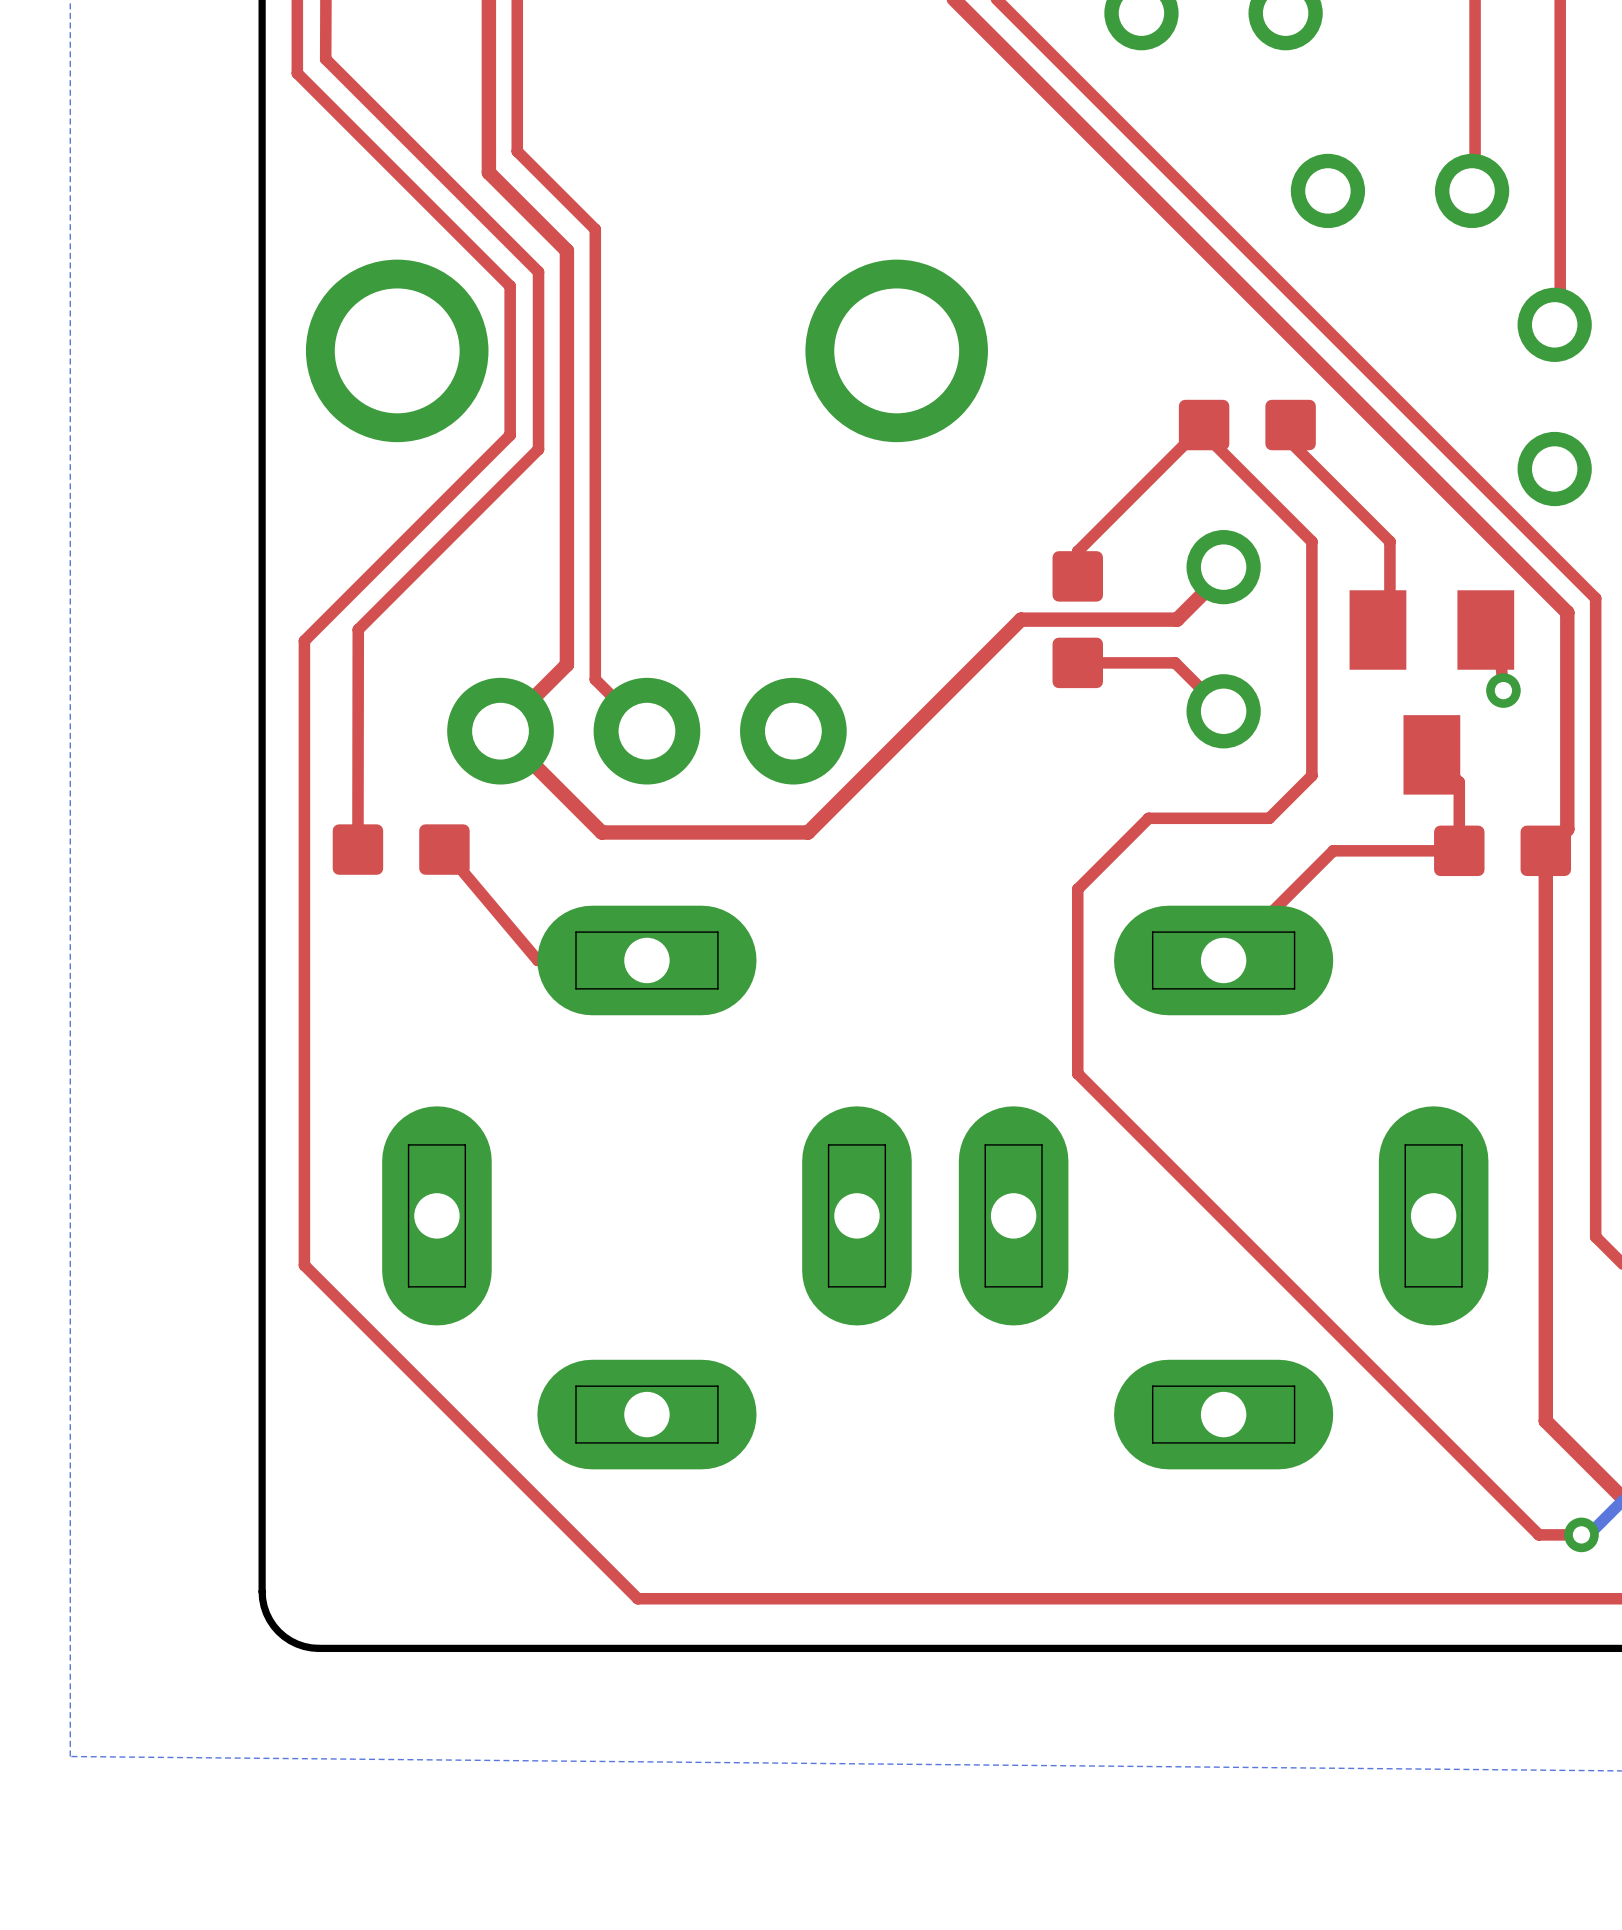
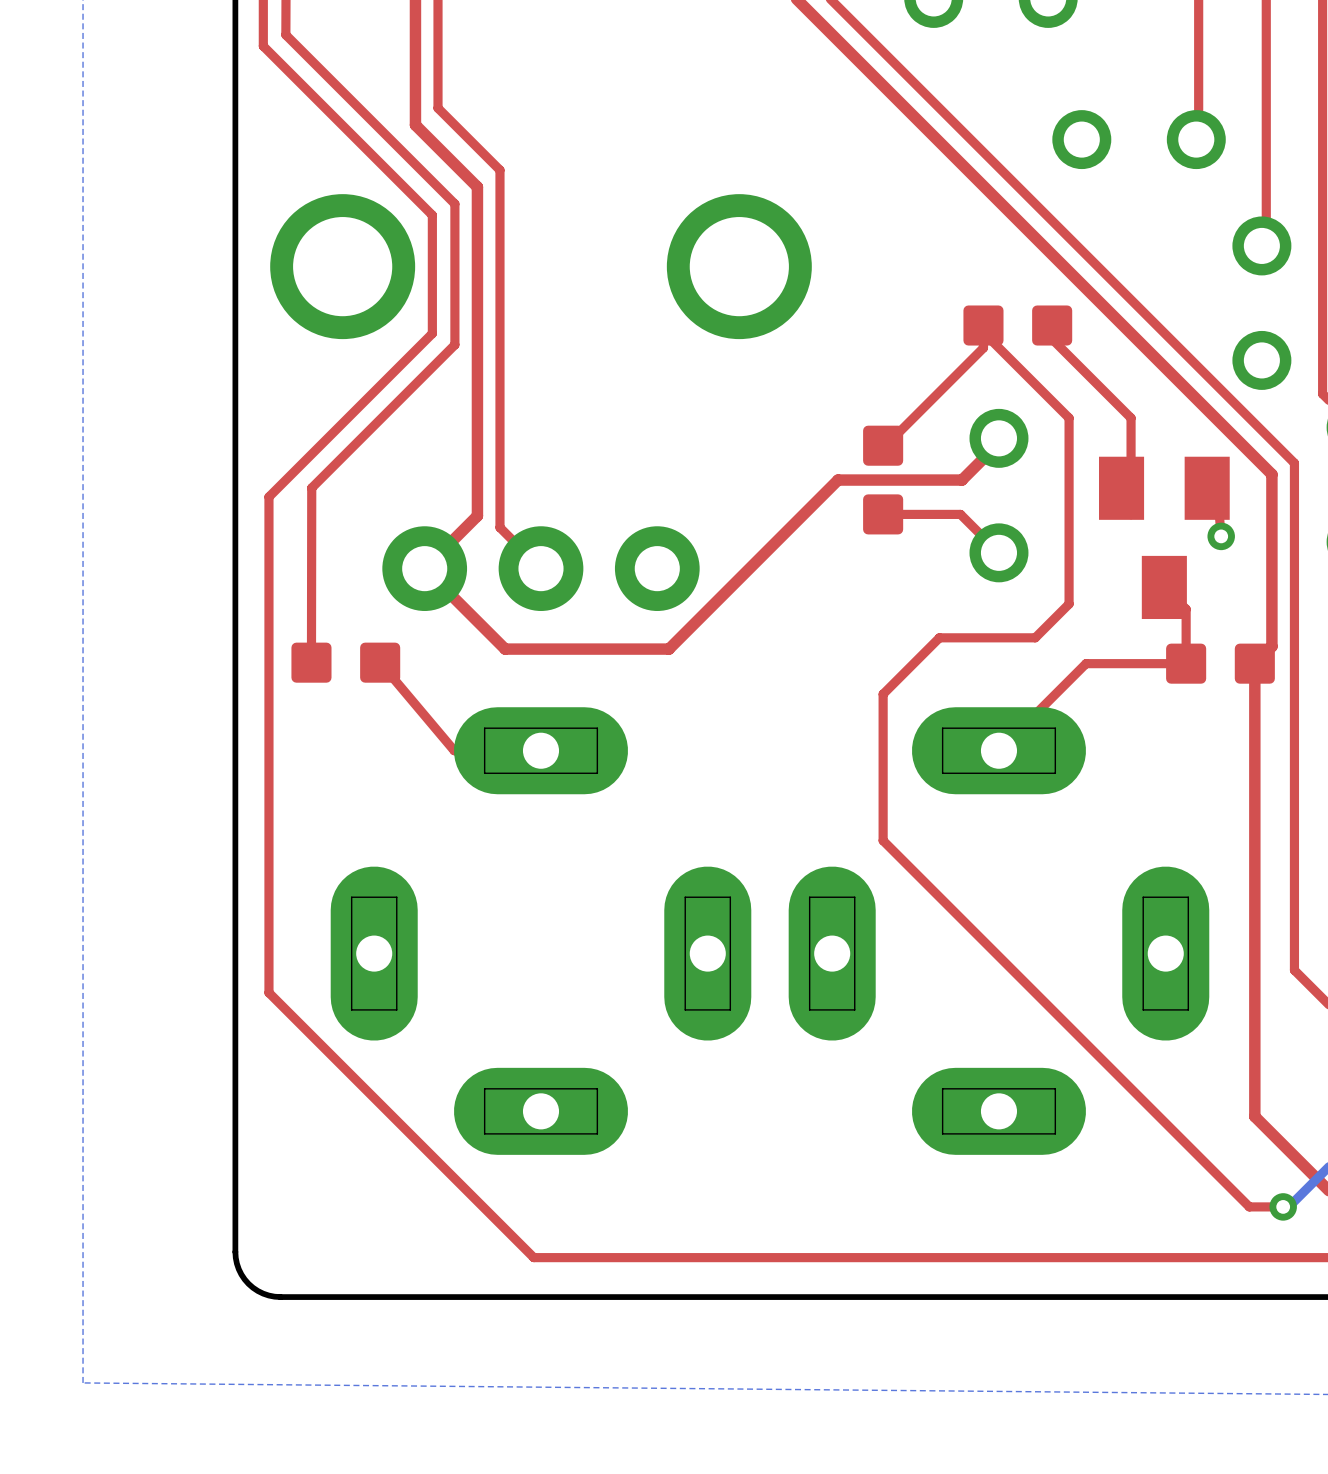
top track: (1204, 425) (1077, 551) (1077, 576) -> none
top track: none -> (983, 332) (983, 347) (884, 446)

